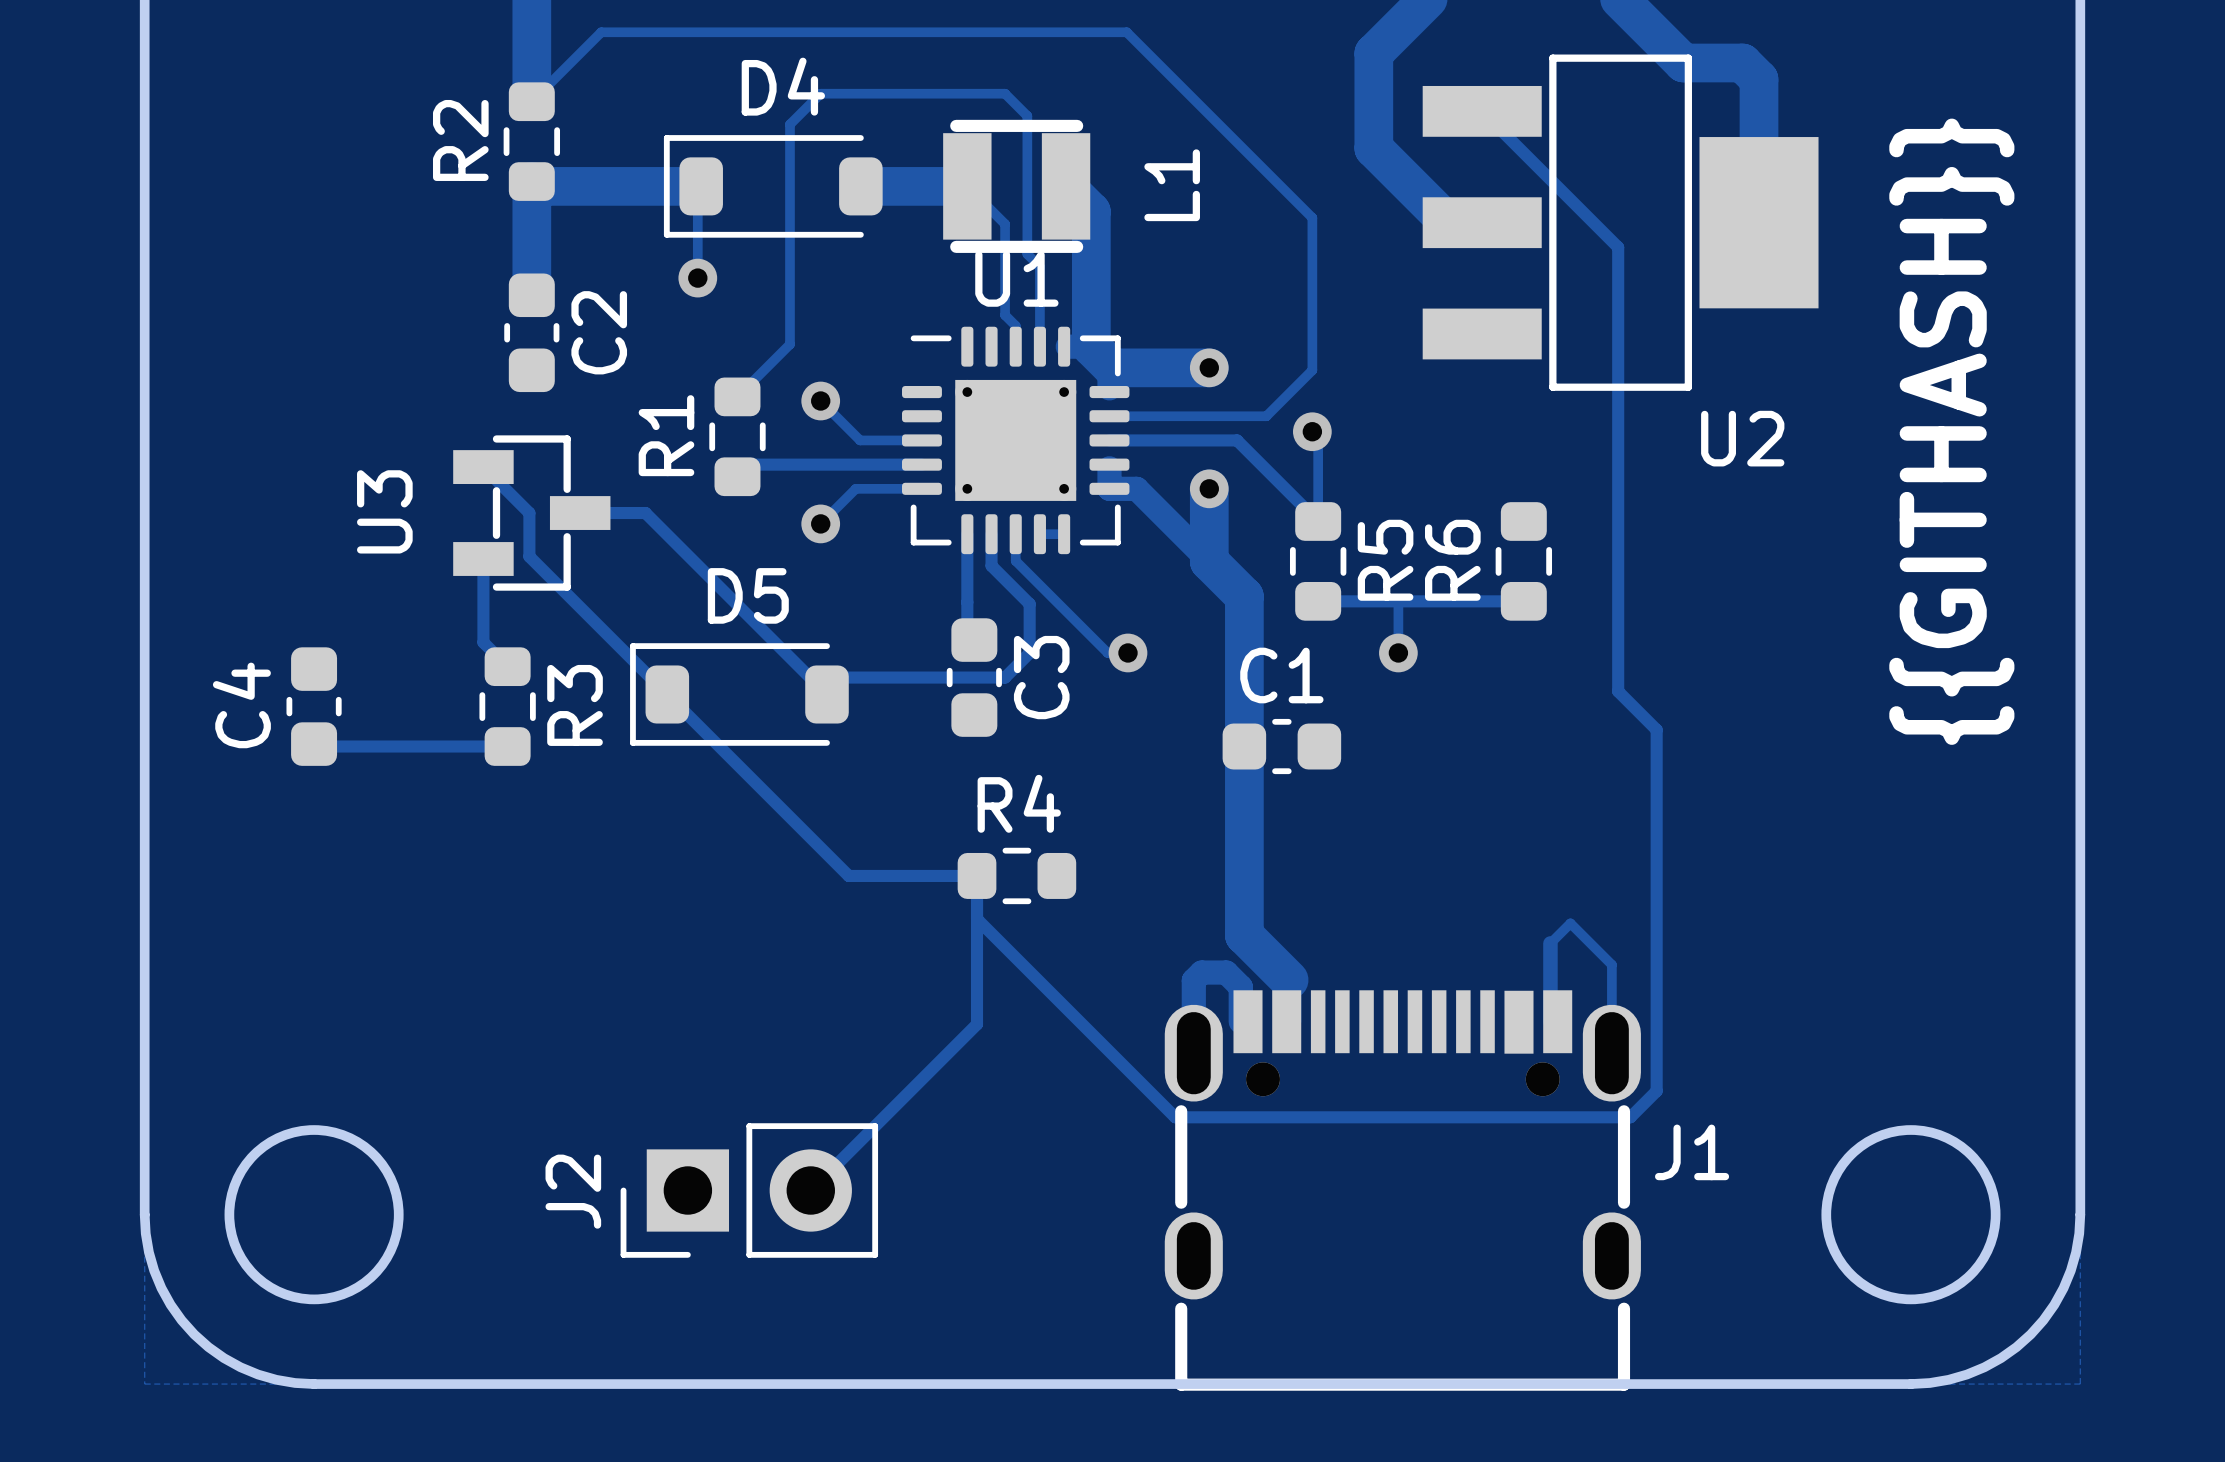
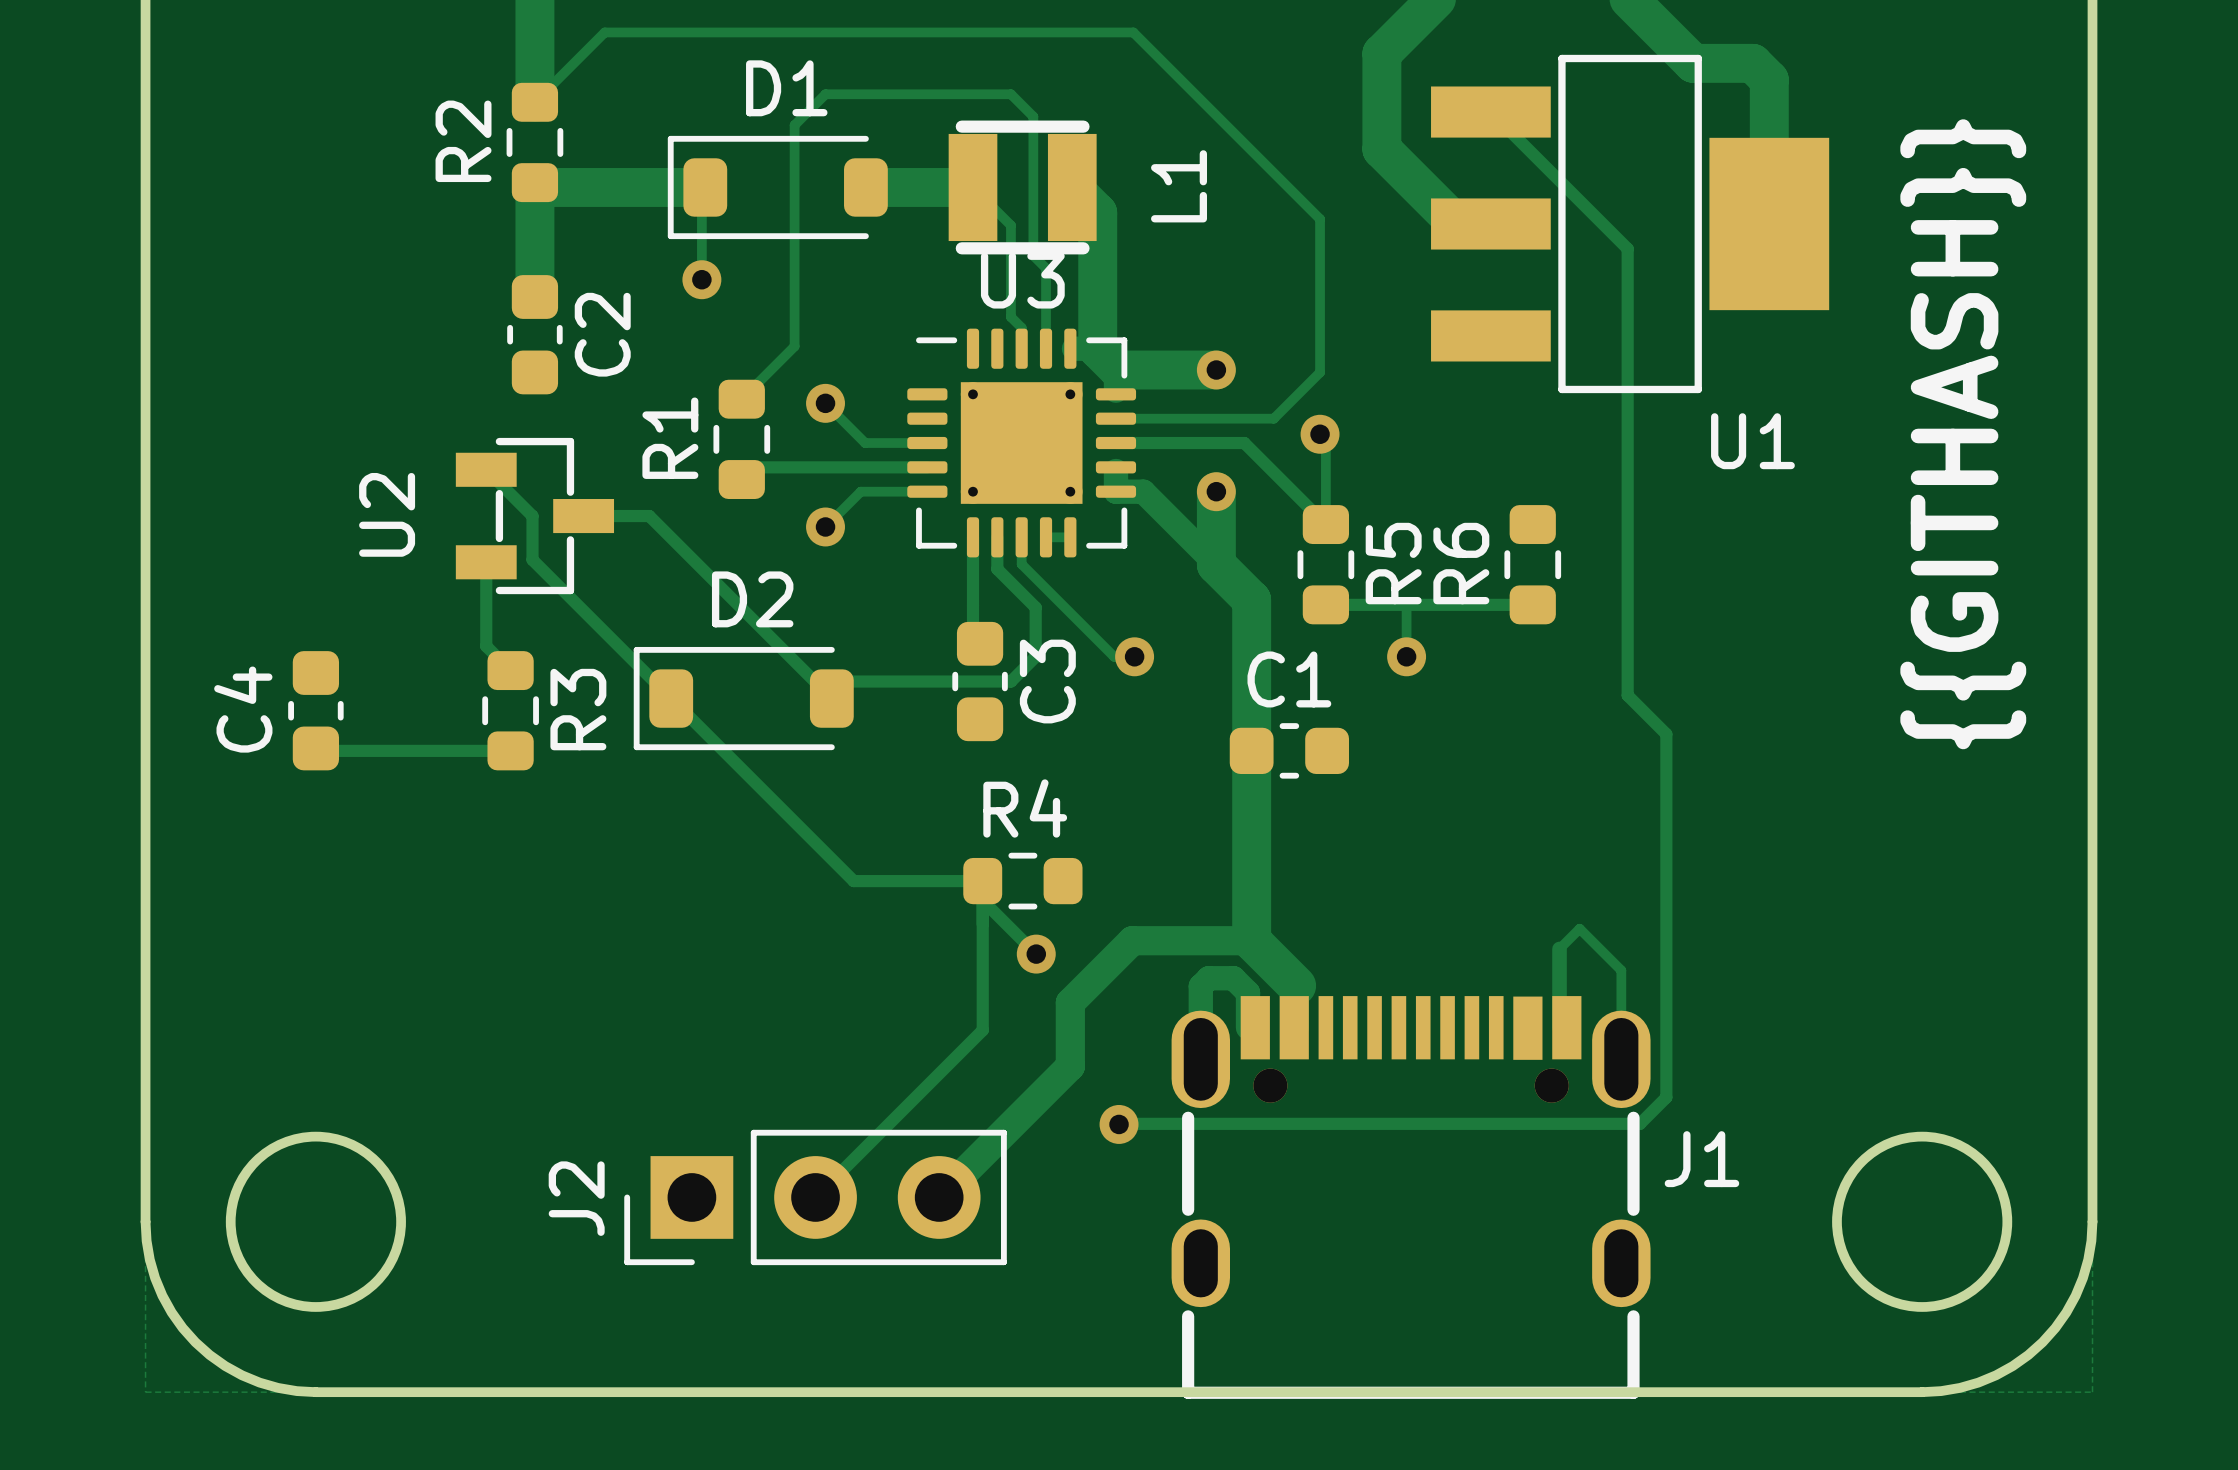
D4 name: D4 (783, 86) -> D1 (786, 88)
U1 name: U1 (1016, 278) -> U3 (1022, 280)
U2 name: U2 (1742, 438) -> U1 (1752, 441)
U3 name: U3 (384, 511) -> U2 (387, 514)
D5 name: D5 (748, 595) -> D2 (752, 599)
track: none -> (982, 900) (1036, 954)
track: (977, 919) (1175, 1117) -> (1119, 1123) (1182, 1123)
track: none -> (1251, 940) (1132, 940) (1070, 1002) (1070, 1066) (939, 1197)
via: none -> (1036, 954)
via: none -> (1119, 1124)
J2 footprint: [620, 1123, 879, 1258] -> [624, 1129, 1007, 1266]

